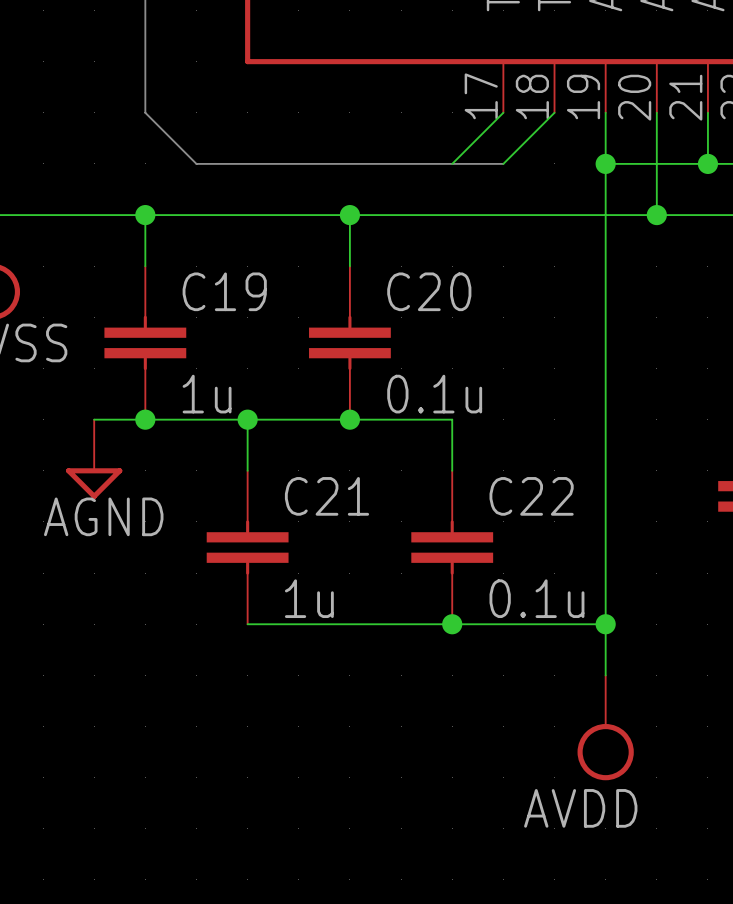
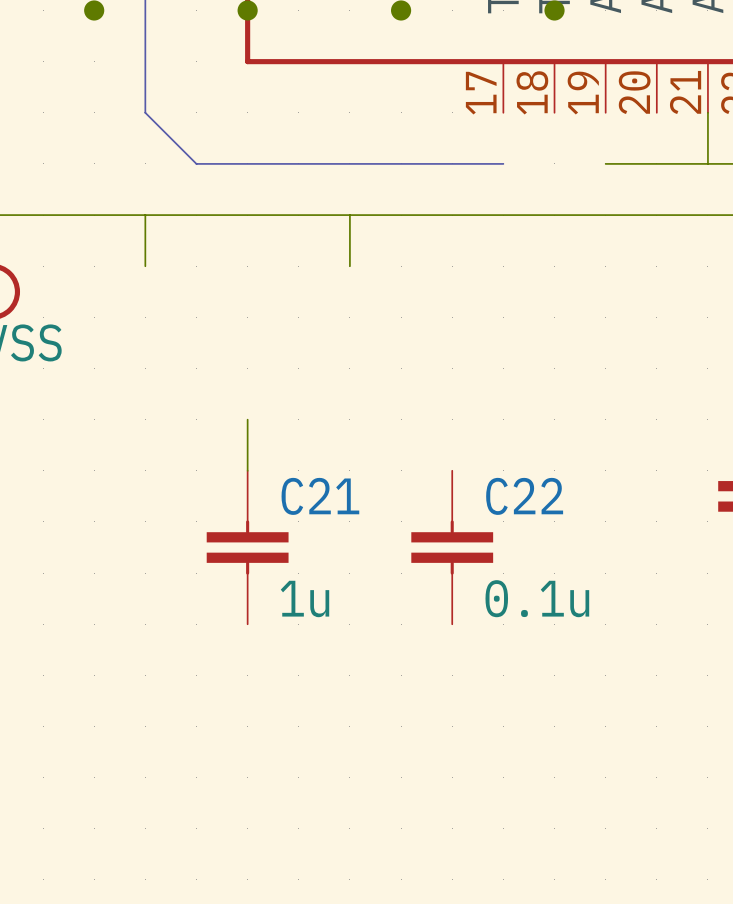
junction: none -> (94, 10)
junction: none -> (247, 10)
junction: none -> (401, 10)
junction: none -> (554, 10)
wire: (503, 112) (452, 163) -> none
wire: (554, 112) (503, 163) -> none
wire: (605, 112) (605, 675) -> none
wire: (656, 112) (656, 215) -> none
junction: (605, 163) -> none
junction: (707, 163) -> none
junction: (145, 215) -> none
junction: (349, 215) -> none
junction: (656, 215) -> none
C19: 1u (145, 342) -> none
C20: 0.1u (349, 342) -> none
wire: (94, 419) (452, 419) (452, 470) -> none
junction: (145, 419) -> none
junction: (247, 419) -> none
junction: (349, 419) -> none
power symbol: AGND (94, 459) -> none
wire: (247, 624) (605, 624) -> none
junction: (452, 624) -> none
junction: (605, 624) -> none
power symbol: AVDD (605, 727) -> none

